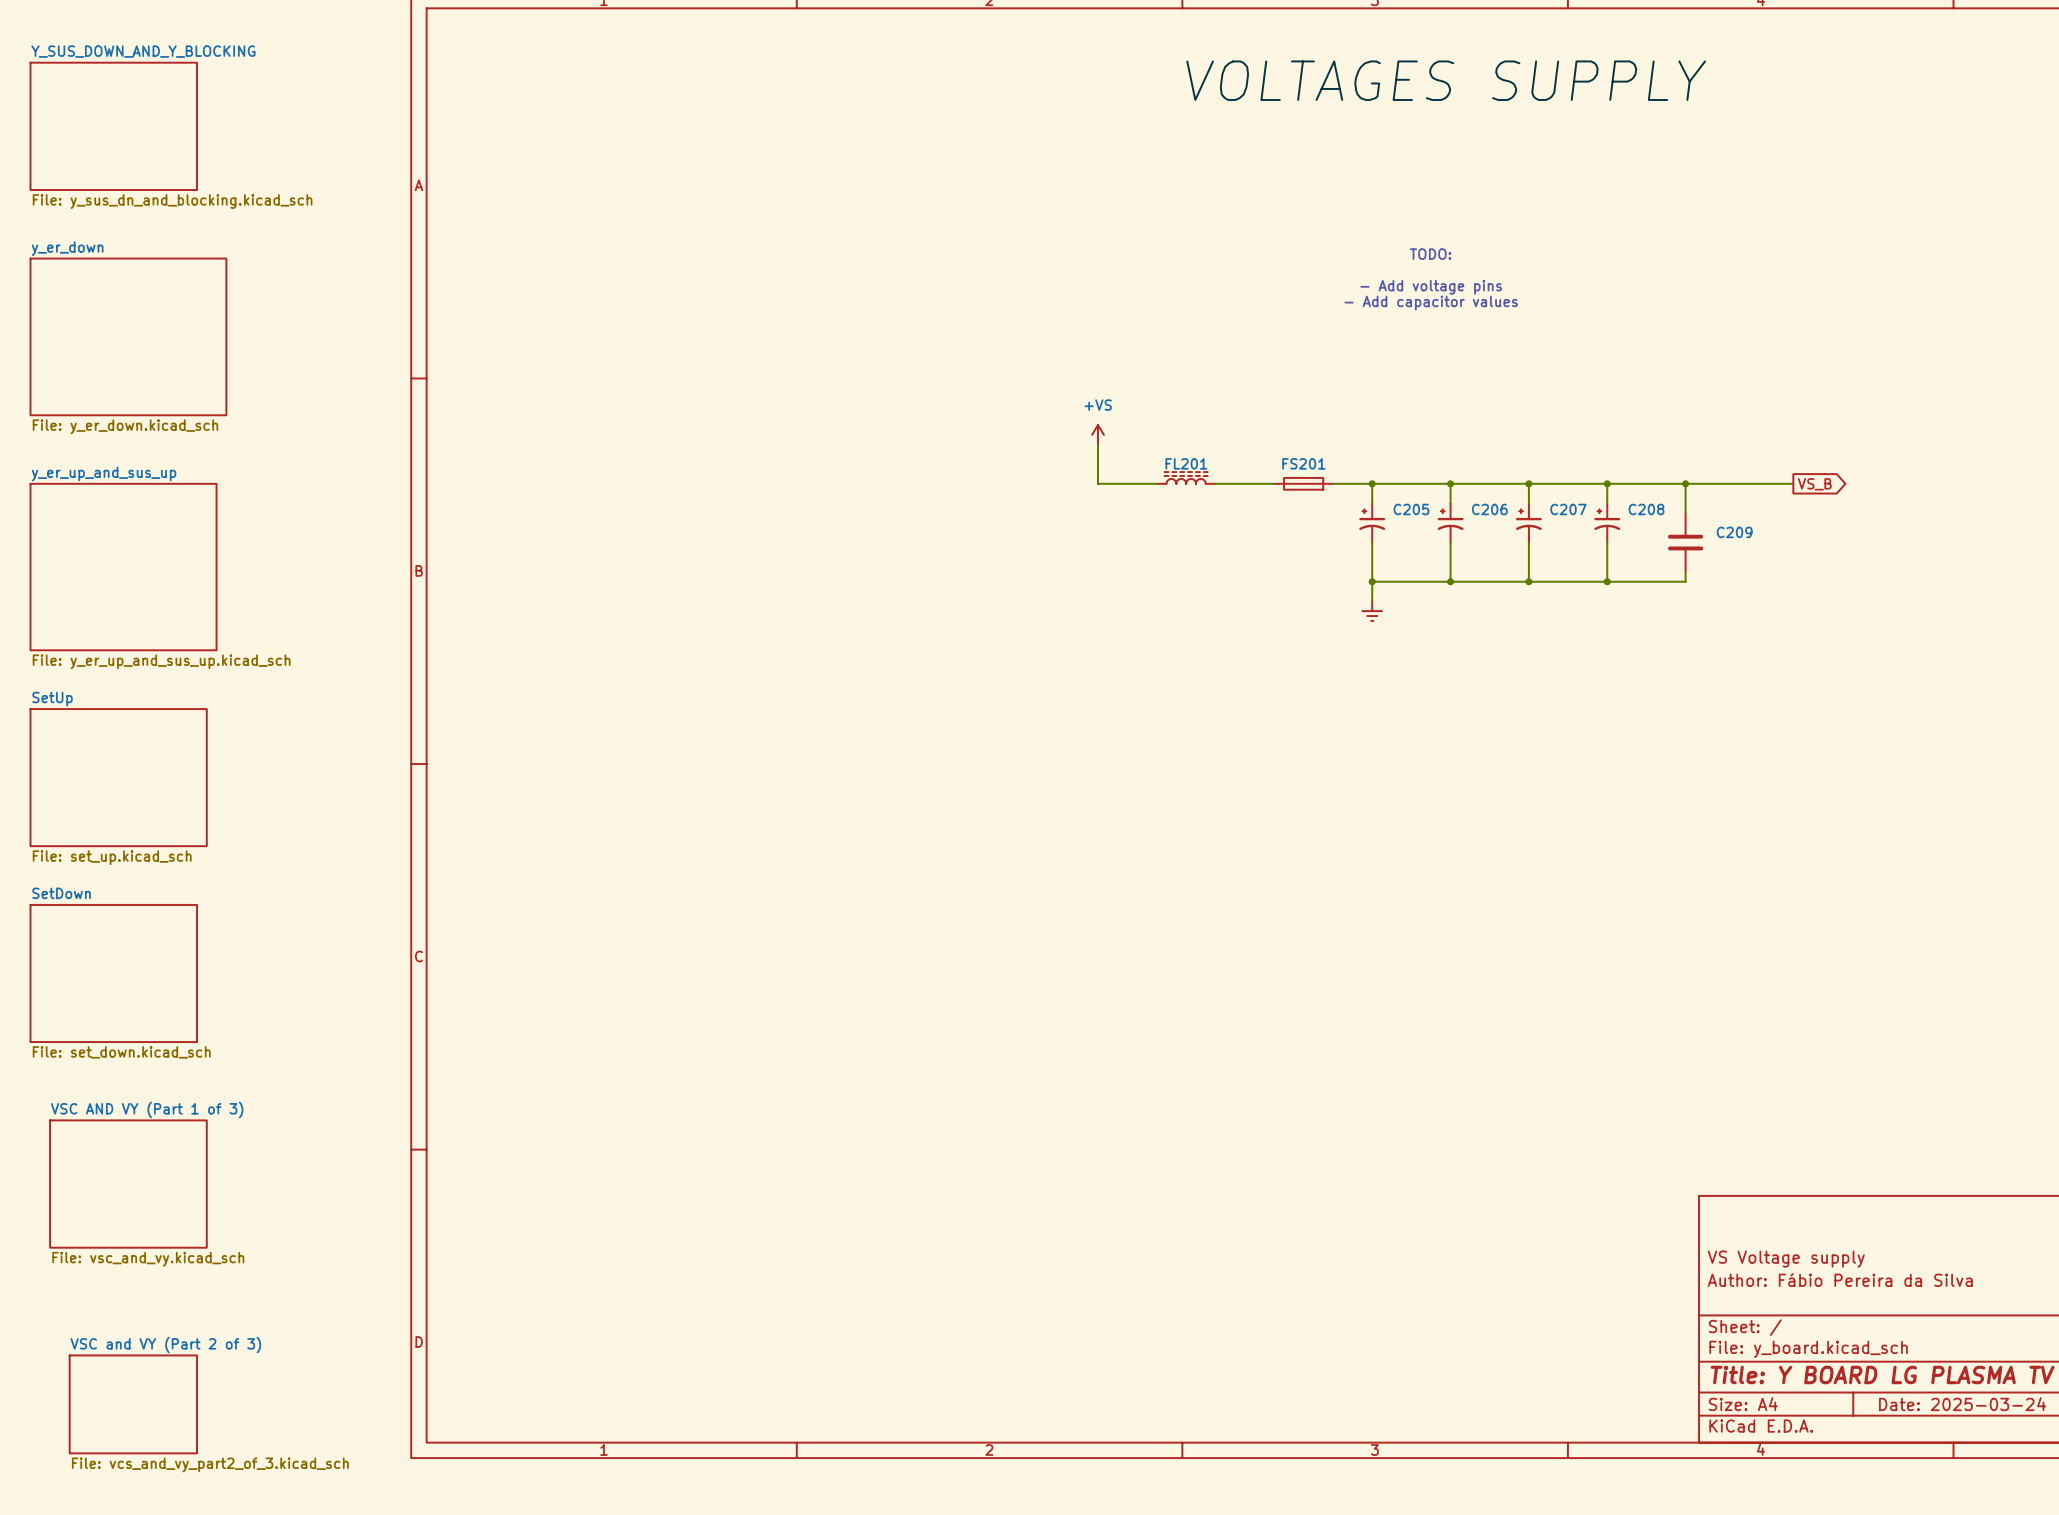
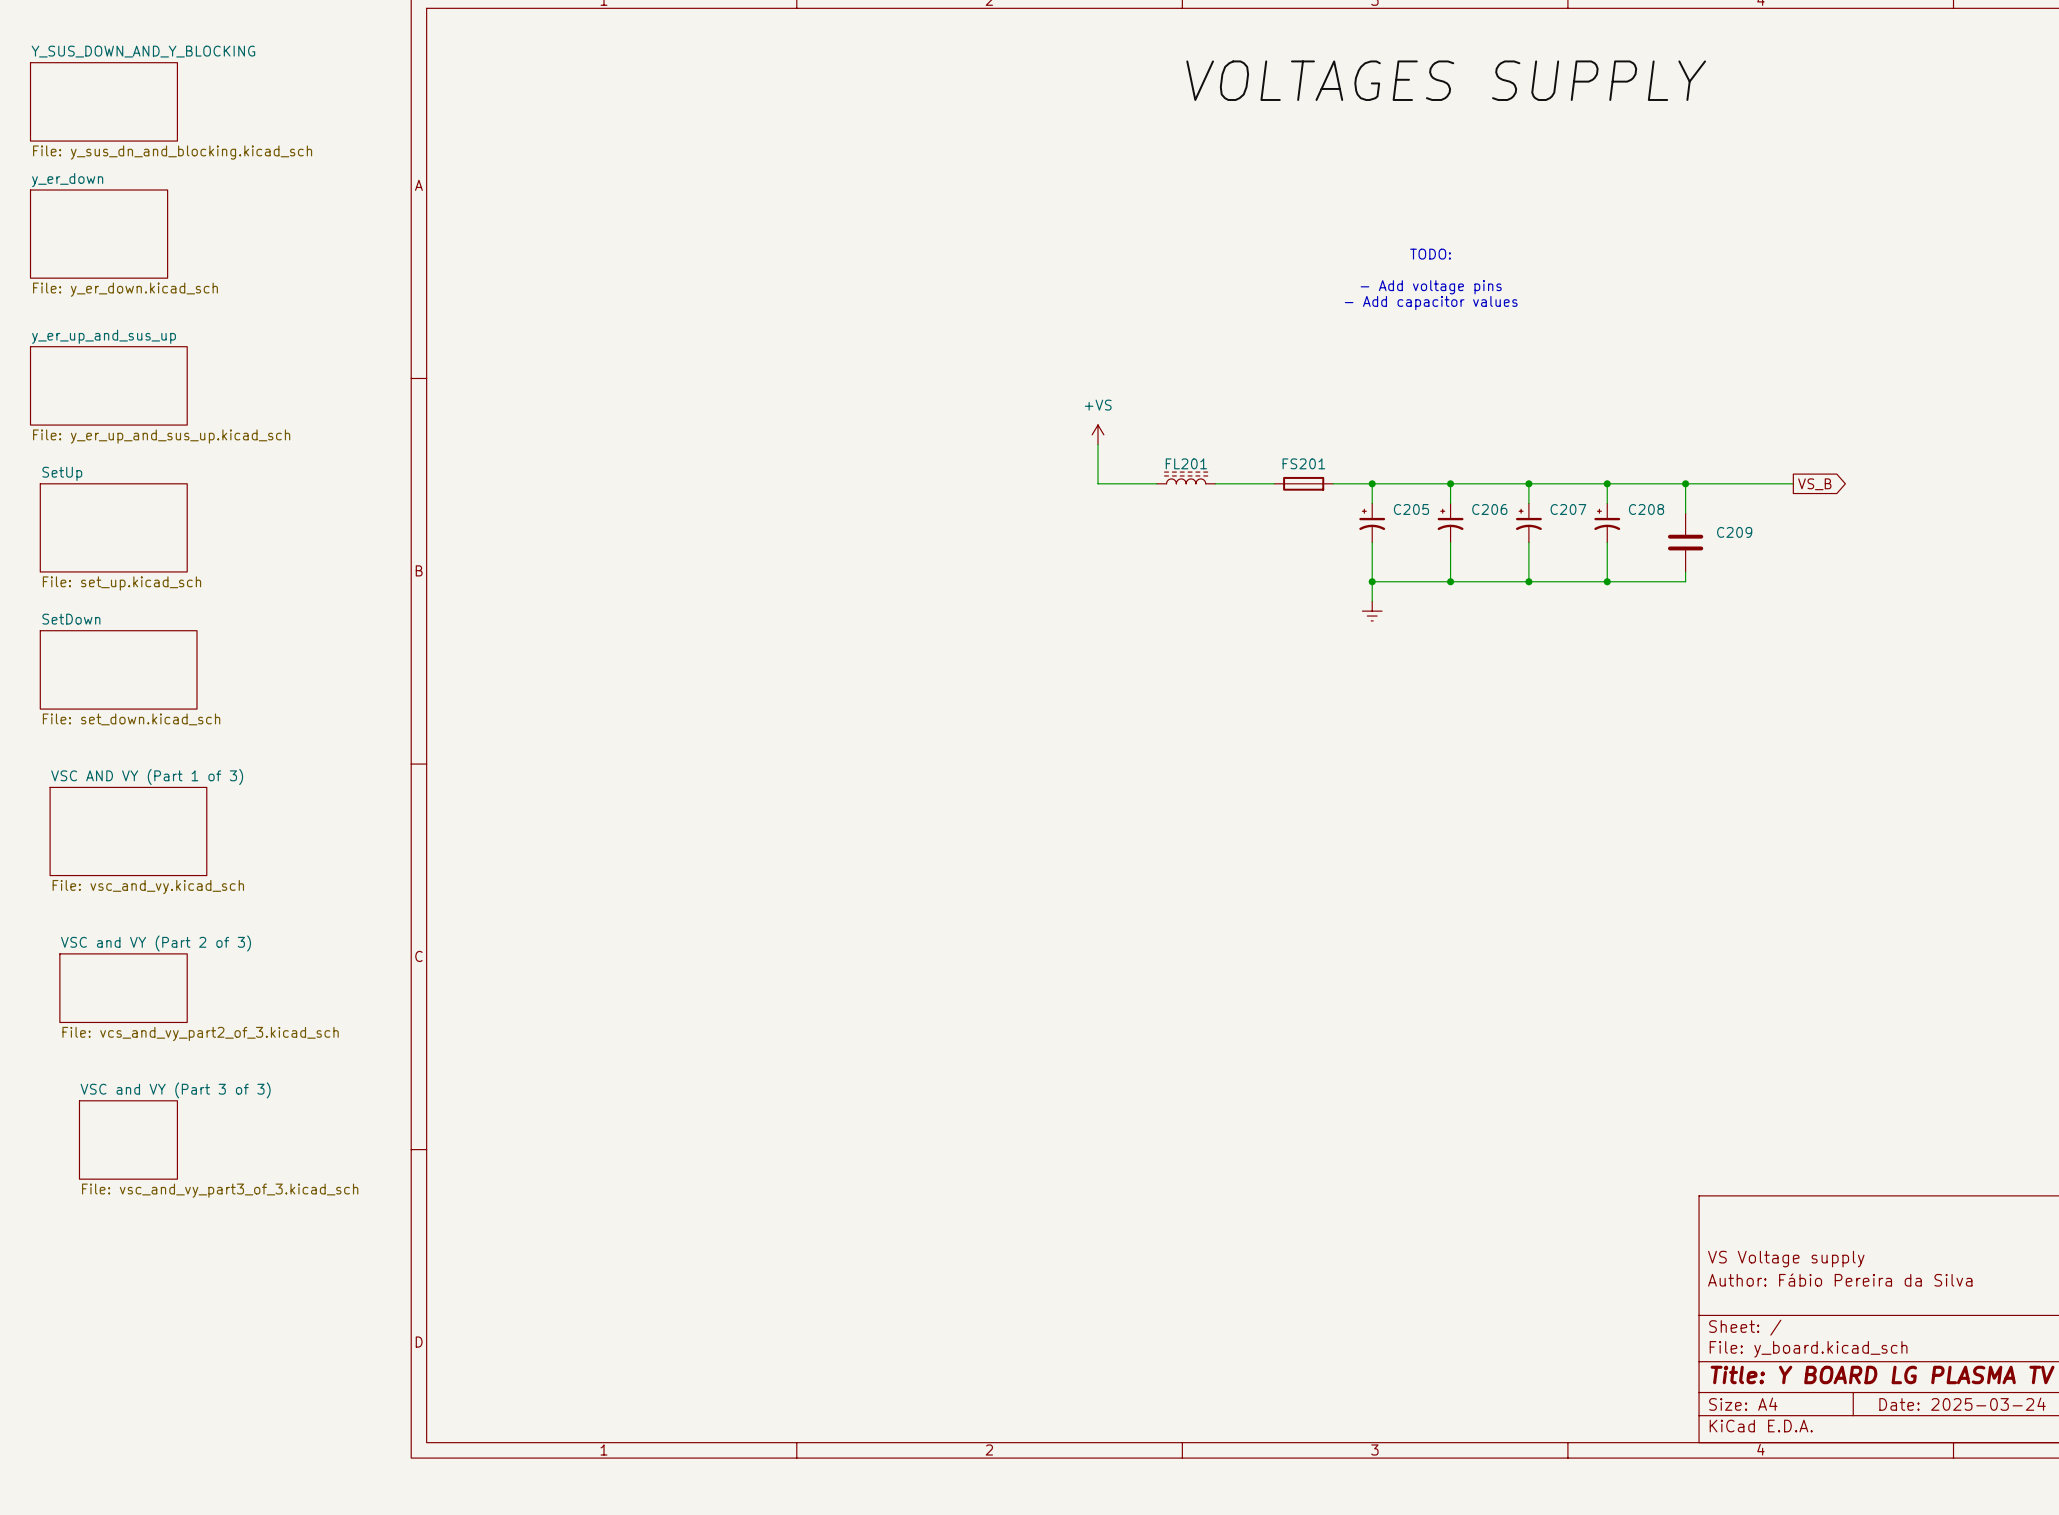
sheet Y_SUS_DOWN_AND_Y_BLOCKING: none -> File: y_sus_dn_and_blocking.kicad_sch (103, 101)
sheet Y_SUS_DOWN_AND_Y_BLOCKING: File: y_sus_dn_and_blocking.kicad_sch (113, 126) -> none
sheet y_er_down: none -> File: y_er_down.kicad_sch (99, 234)
sheet y_er_down: File: y_er_down.kicad_sch (128, 336) -> none
sheet y_er_up_and_sus_up: none -> File: y_er_up_and_sus_up.kicad_sch (108, 385)
sheet SetUp: none -> File: set_up.kicad_sch (113, 527)
sheet y_er_up_and_sus_up: File: y_er_up_and_sus_up.kicad_sch (123, 567) -> none
sheet SetDown: none -> File: set_down.kicad_sch (118, 669)
sheet SetUp: File: set_up.kicad_sch (118, 777) -> none
sheet SetDown: File: set_down.kicad_sch (113, 973) -> none
sheet VSC AND VY (Part 1 of 3) name position: VSC AND VY (Part 1 of 3) (147, 1109) -> VSC AND VY (Part 1 of 3) (147, 776)
sheet VSC AND VY (Part 1 of 3) shape: [49, 1119, 208, 1249] -> [49, 786, 208, 877]
sheet VSC and VY (Part 3 of 3): none -> File: vsc_and_vy_part3_of_3.kicad_sch (128, 1139)
sheet VSC AND VY (Part 1 of 3) value position: File: vsc_and_vy.kicad_sch (148, 1259) -> File: vsc_and_vy.kicad_sch (148, 887)
sheet VSC and VY (Part 2 of 3) shape: [69, 1354, 198, 1454] -> [59, 953, 188, 1024]

